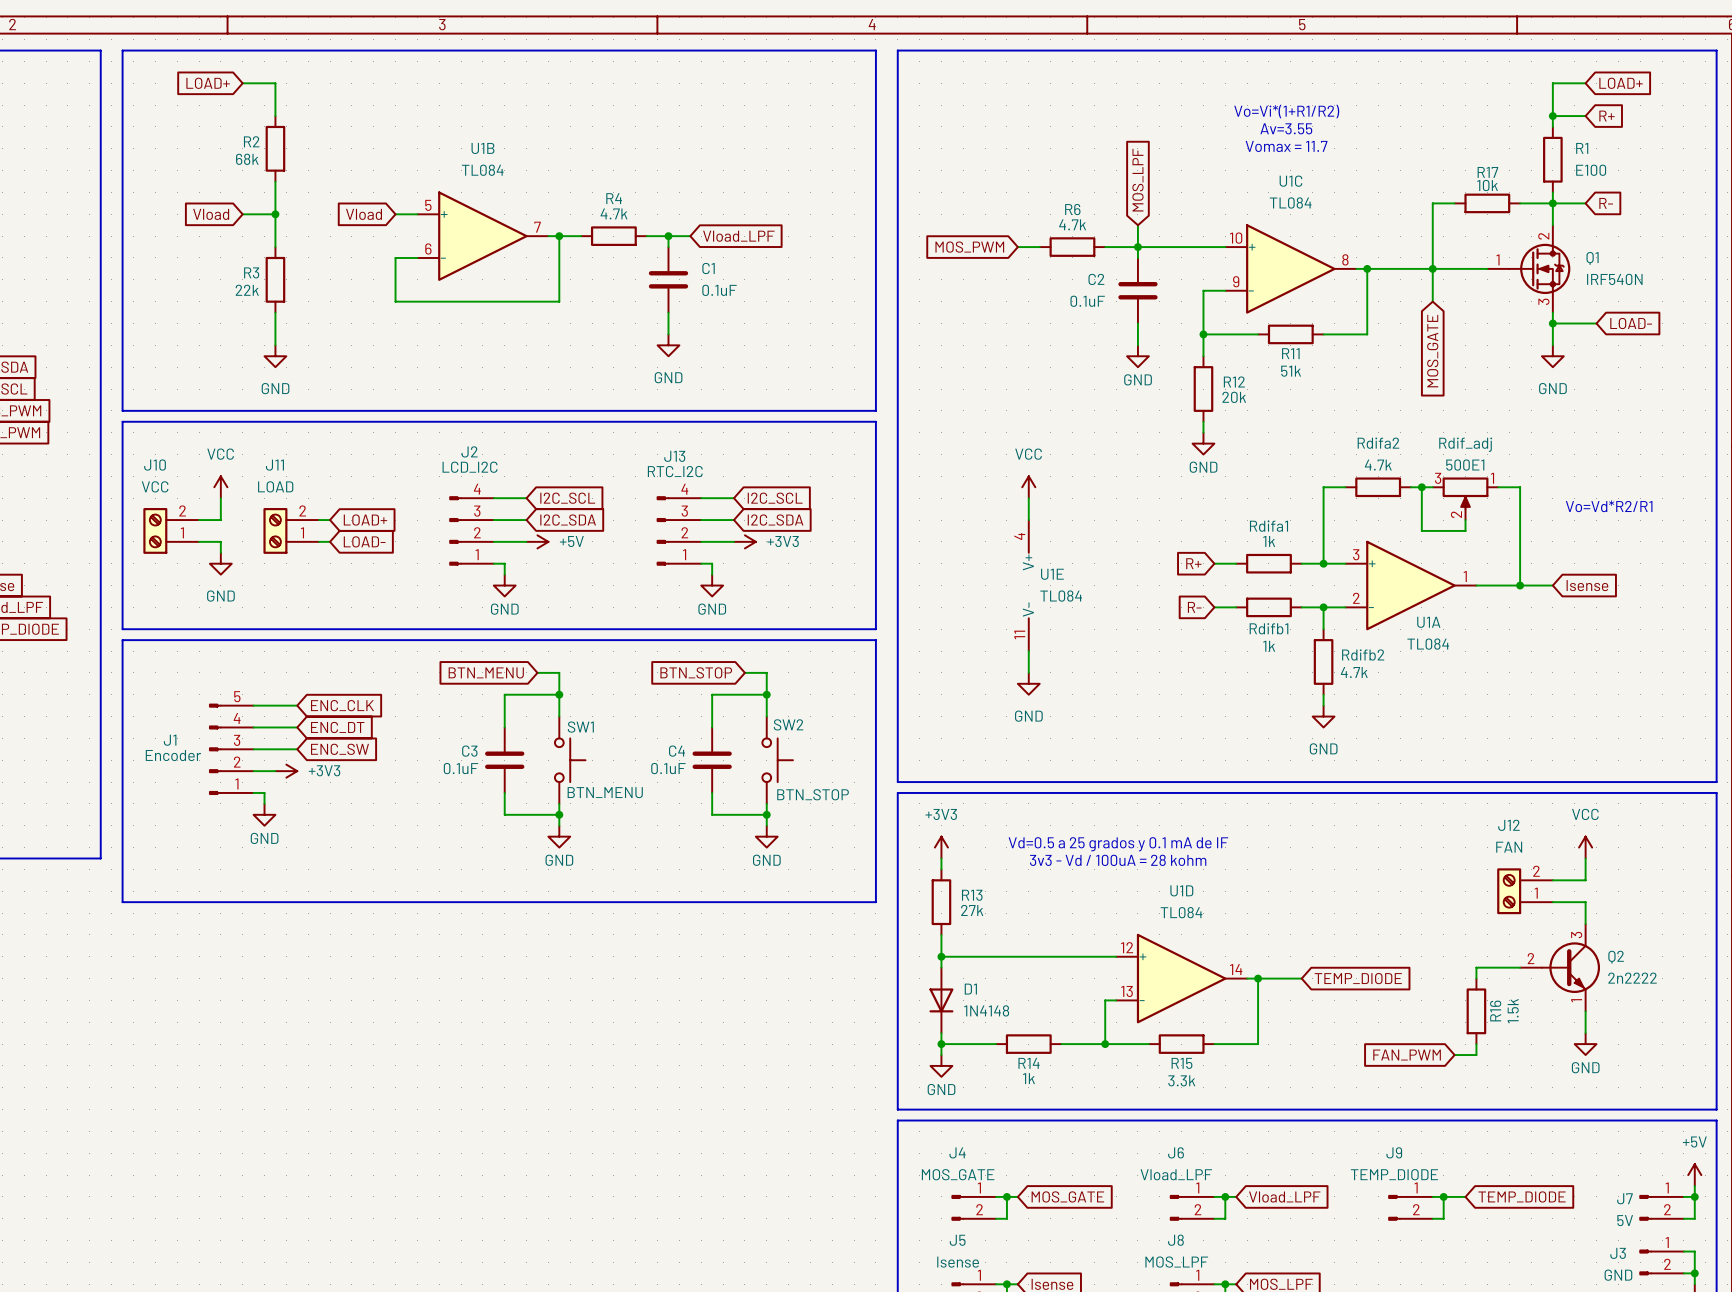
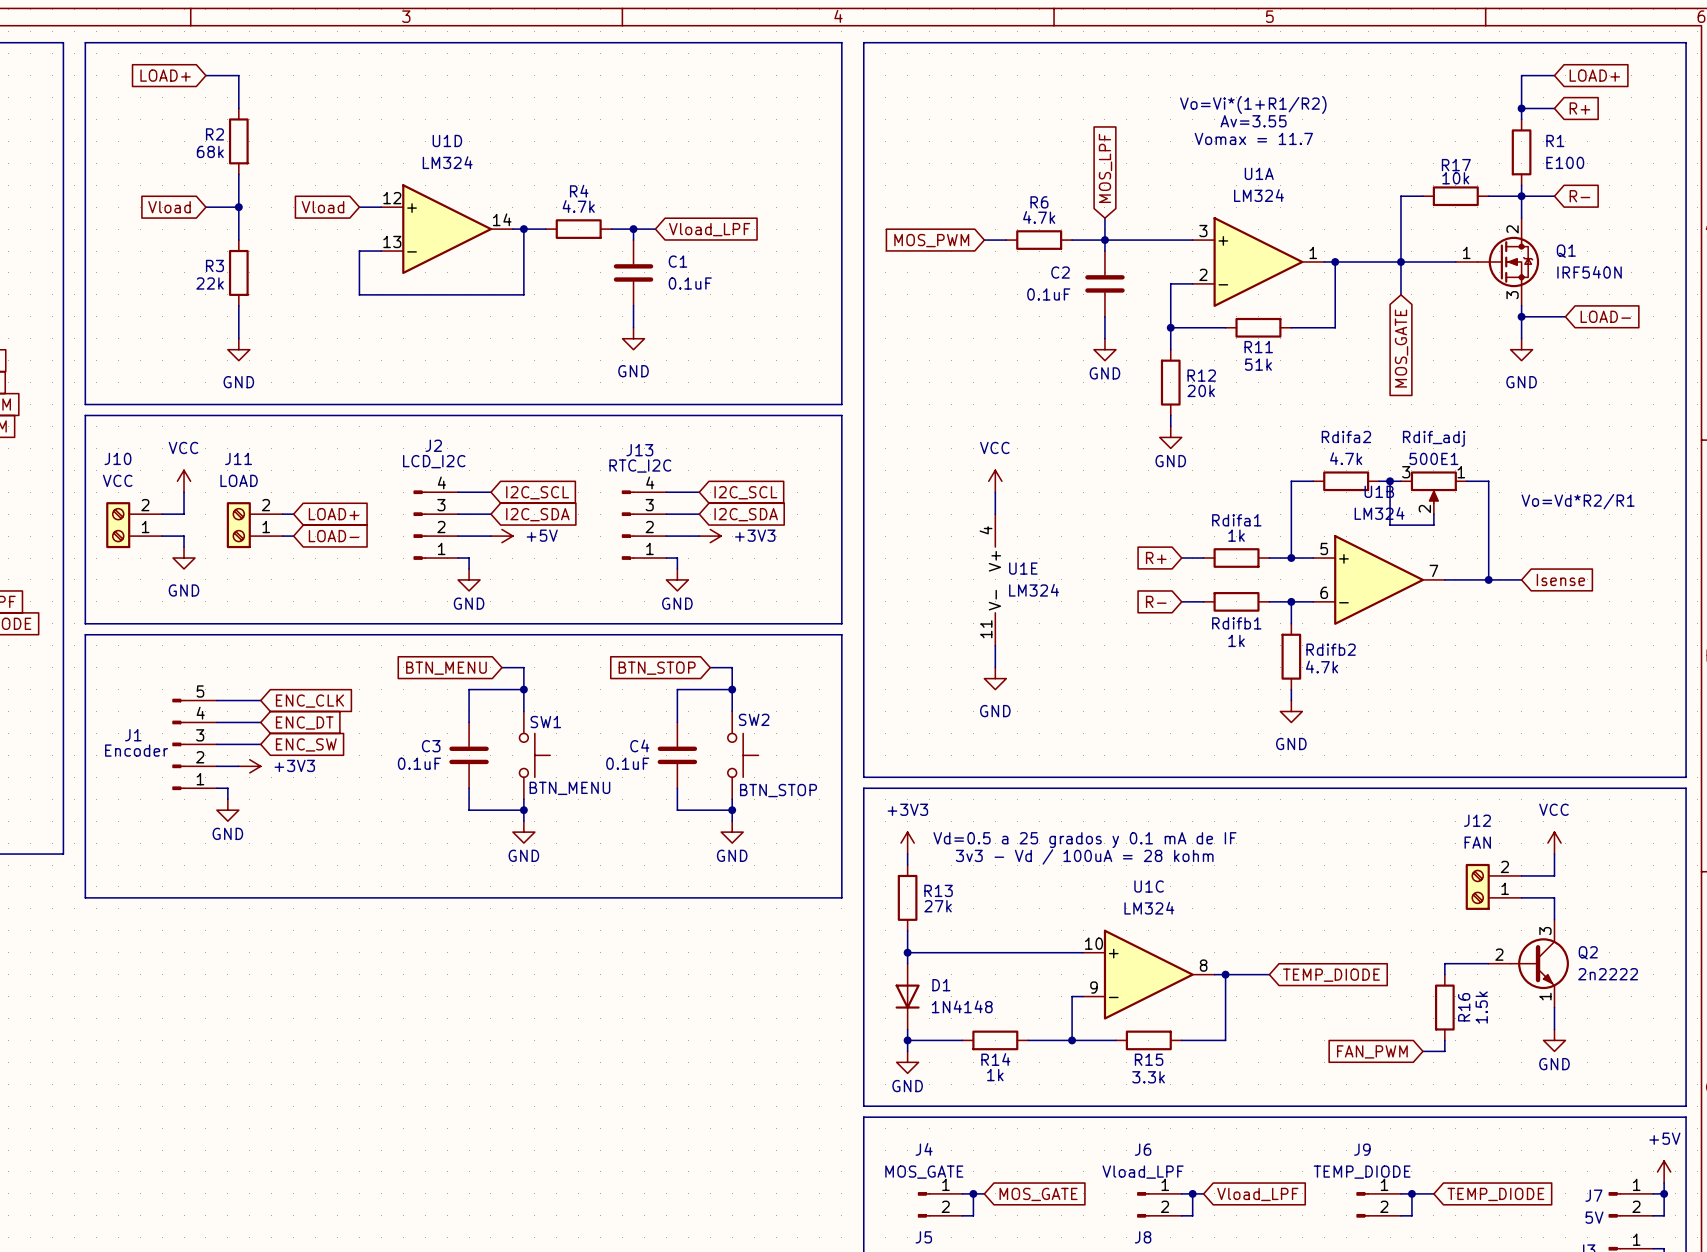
U1B value: TL084 (482, 170) -> LM324 (1379, 513)
U1C value: TL084 (1290, 202) -> LM324 (1149, 908)
U1B position: (482, 236) -> (1379, 579)
U1C position: (1290, 268) -> (1148, 974)
U1A position: (1410, 585) -> (1258, 261)
U1E value: TL084 (1061, 596) -> LM324 (1034, 590)
U1A name position: U1A (1428, 622) -> U1A (1259, 173)
U1A value: TL084 (1428, 644) -> LM324 (1258, 195)
U1D value: TL084 (1181, 912) -> LM324 (447, 162)
U1D position: (1181, 978) -> (447, 229)

